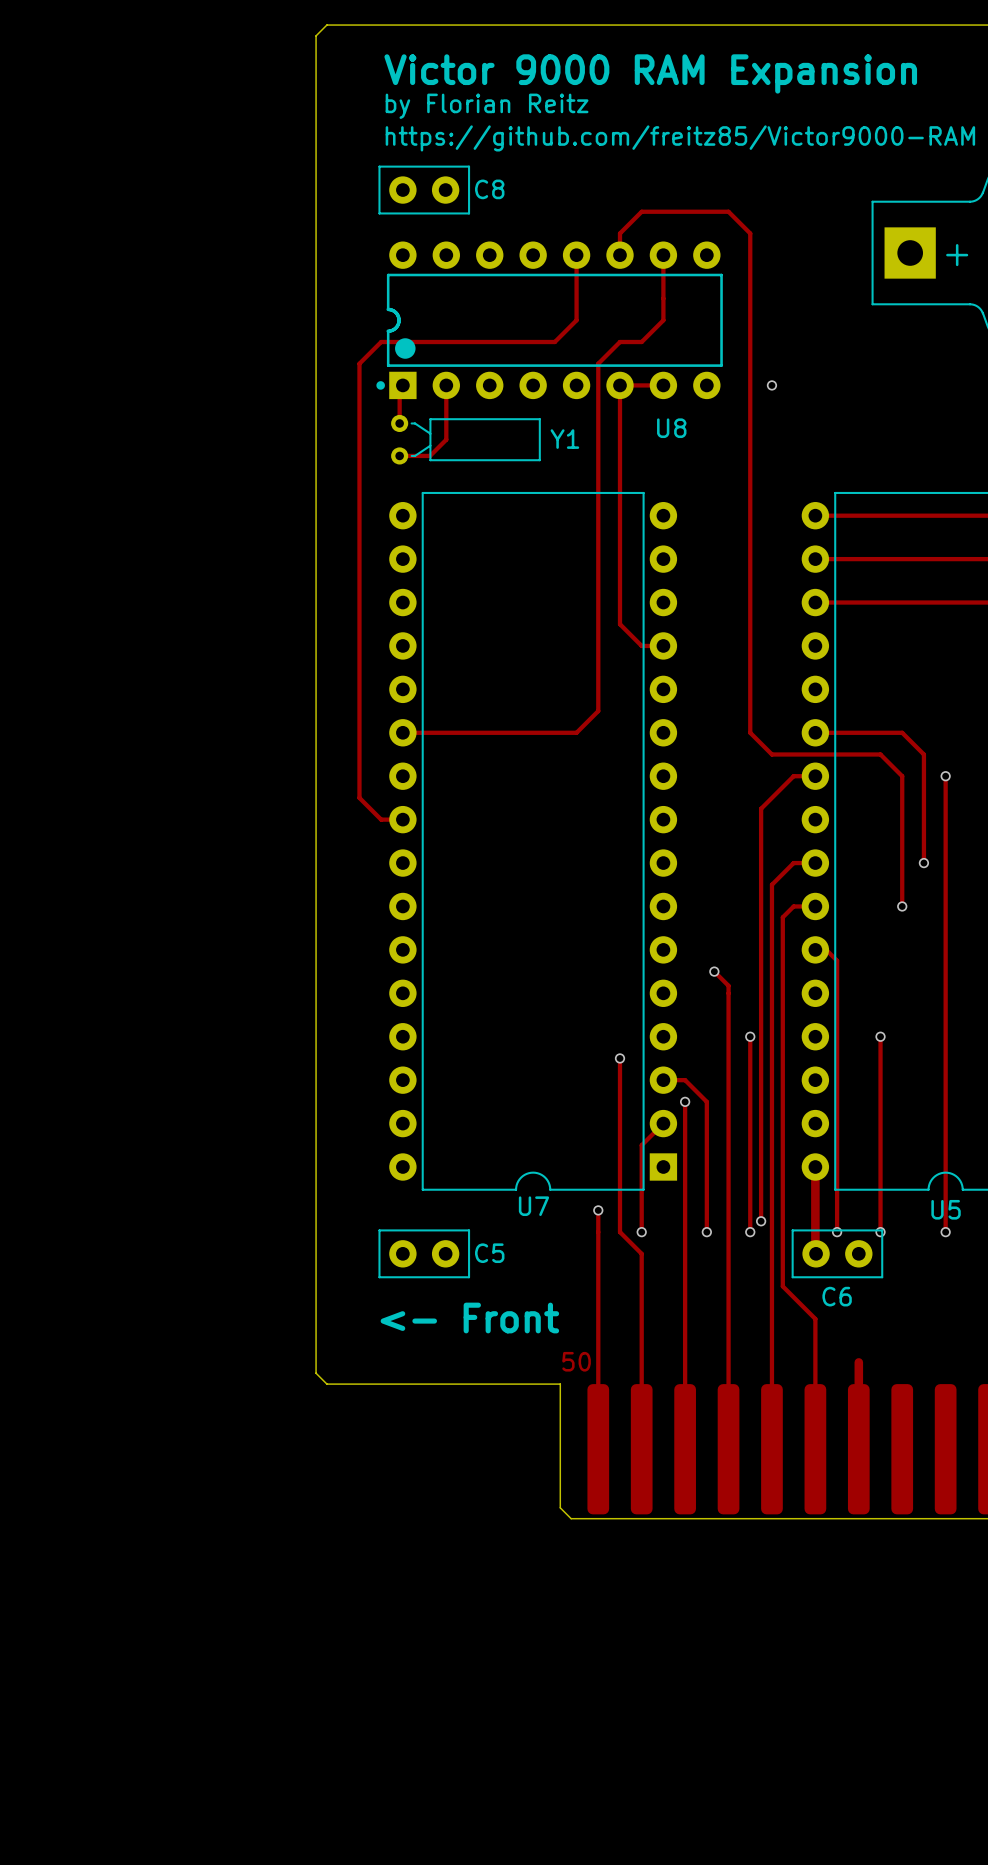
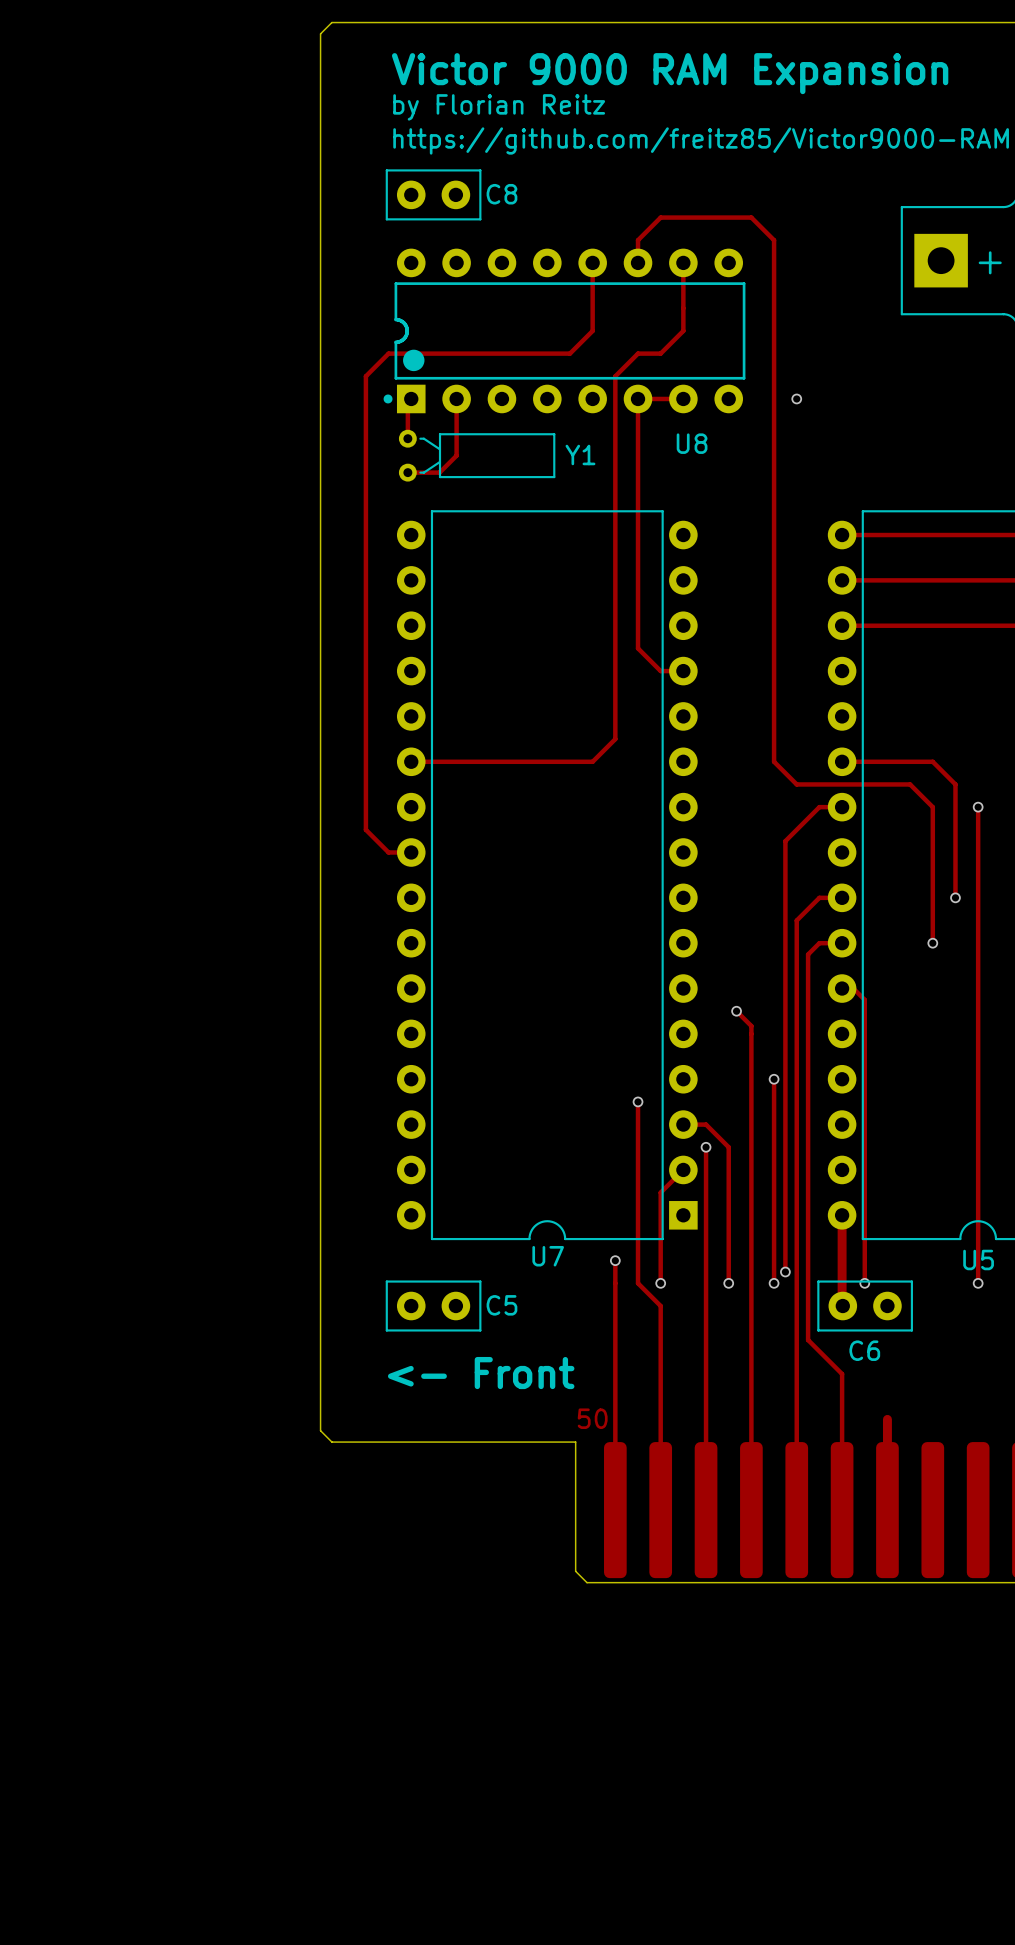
track: (880, 1036) (880, 1232) -> none
via: (880, 1036) -> none
via: (880, 1232) -> none

